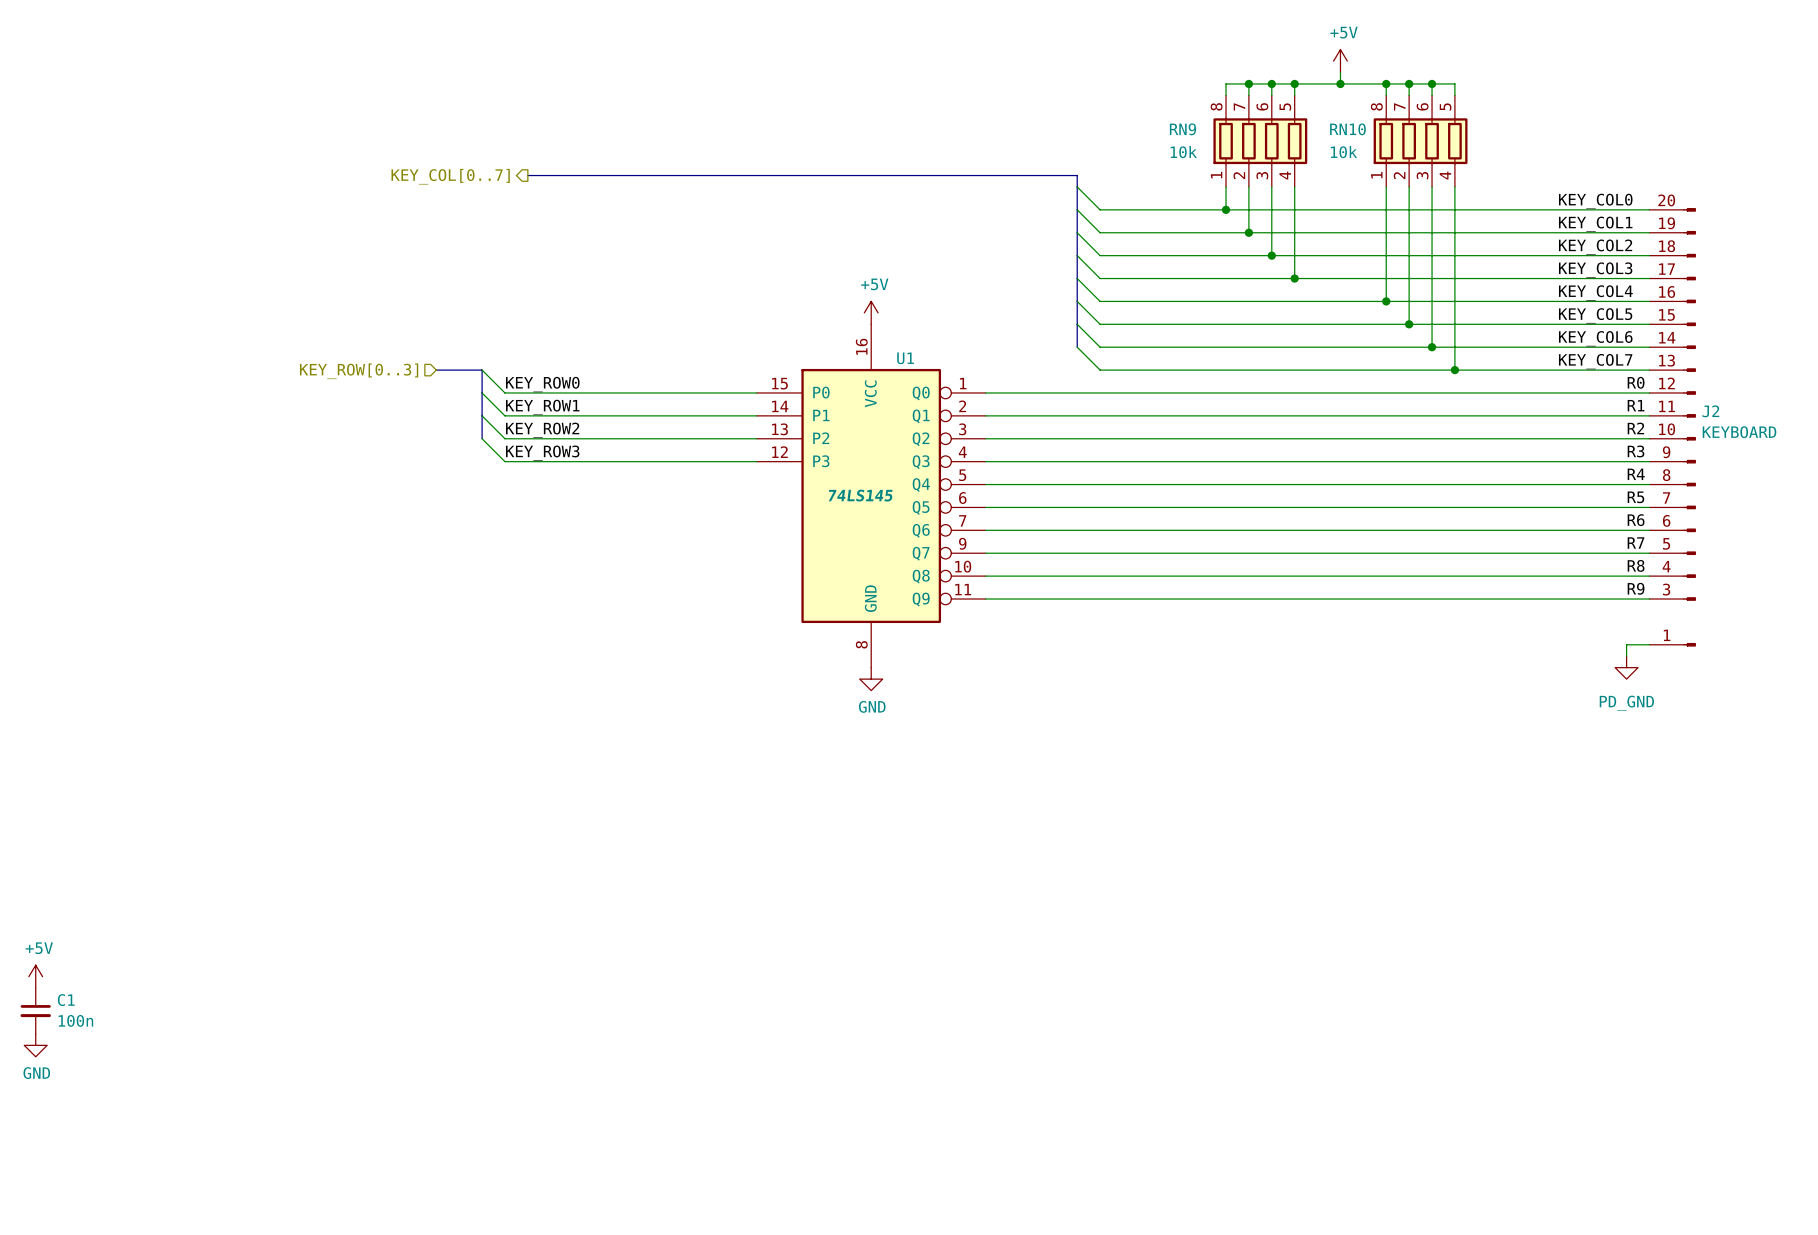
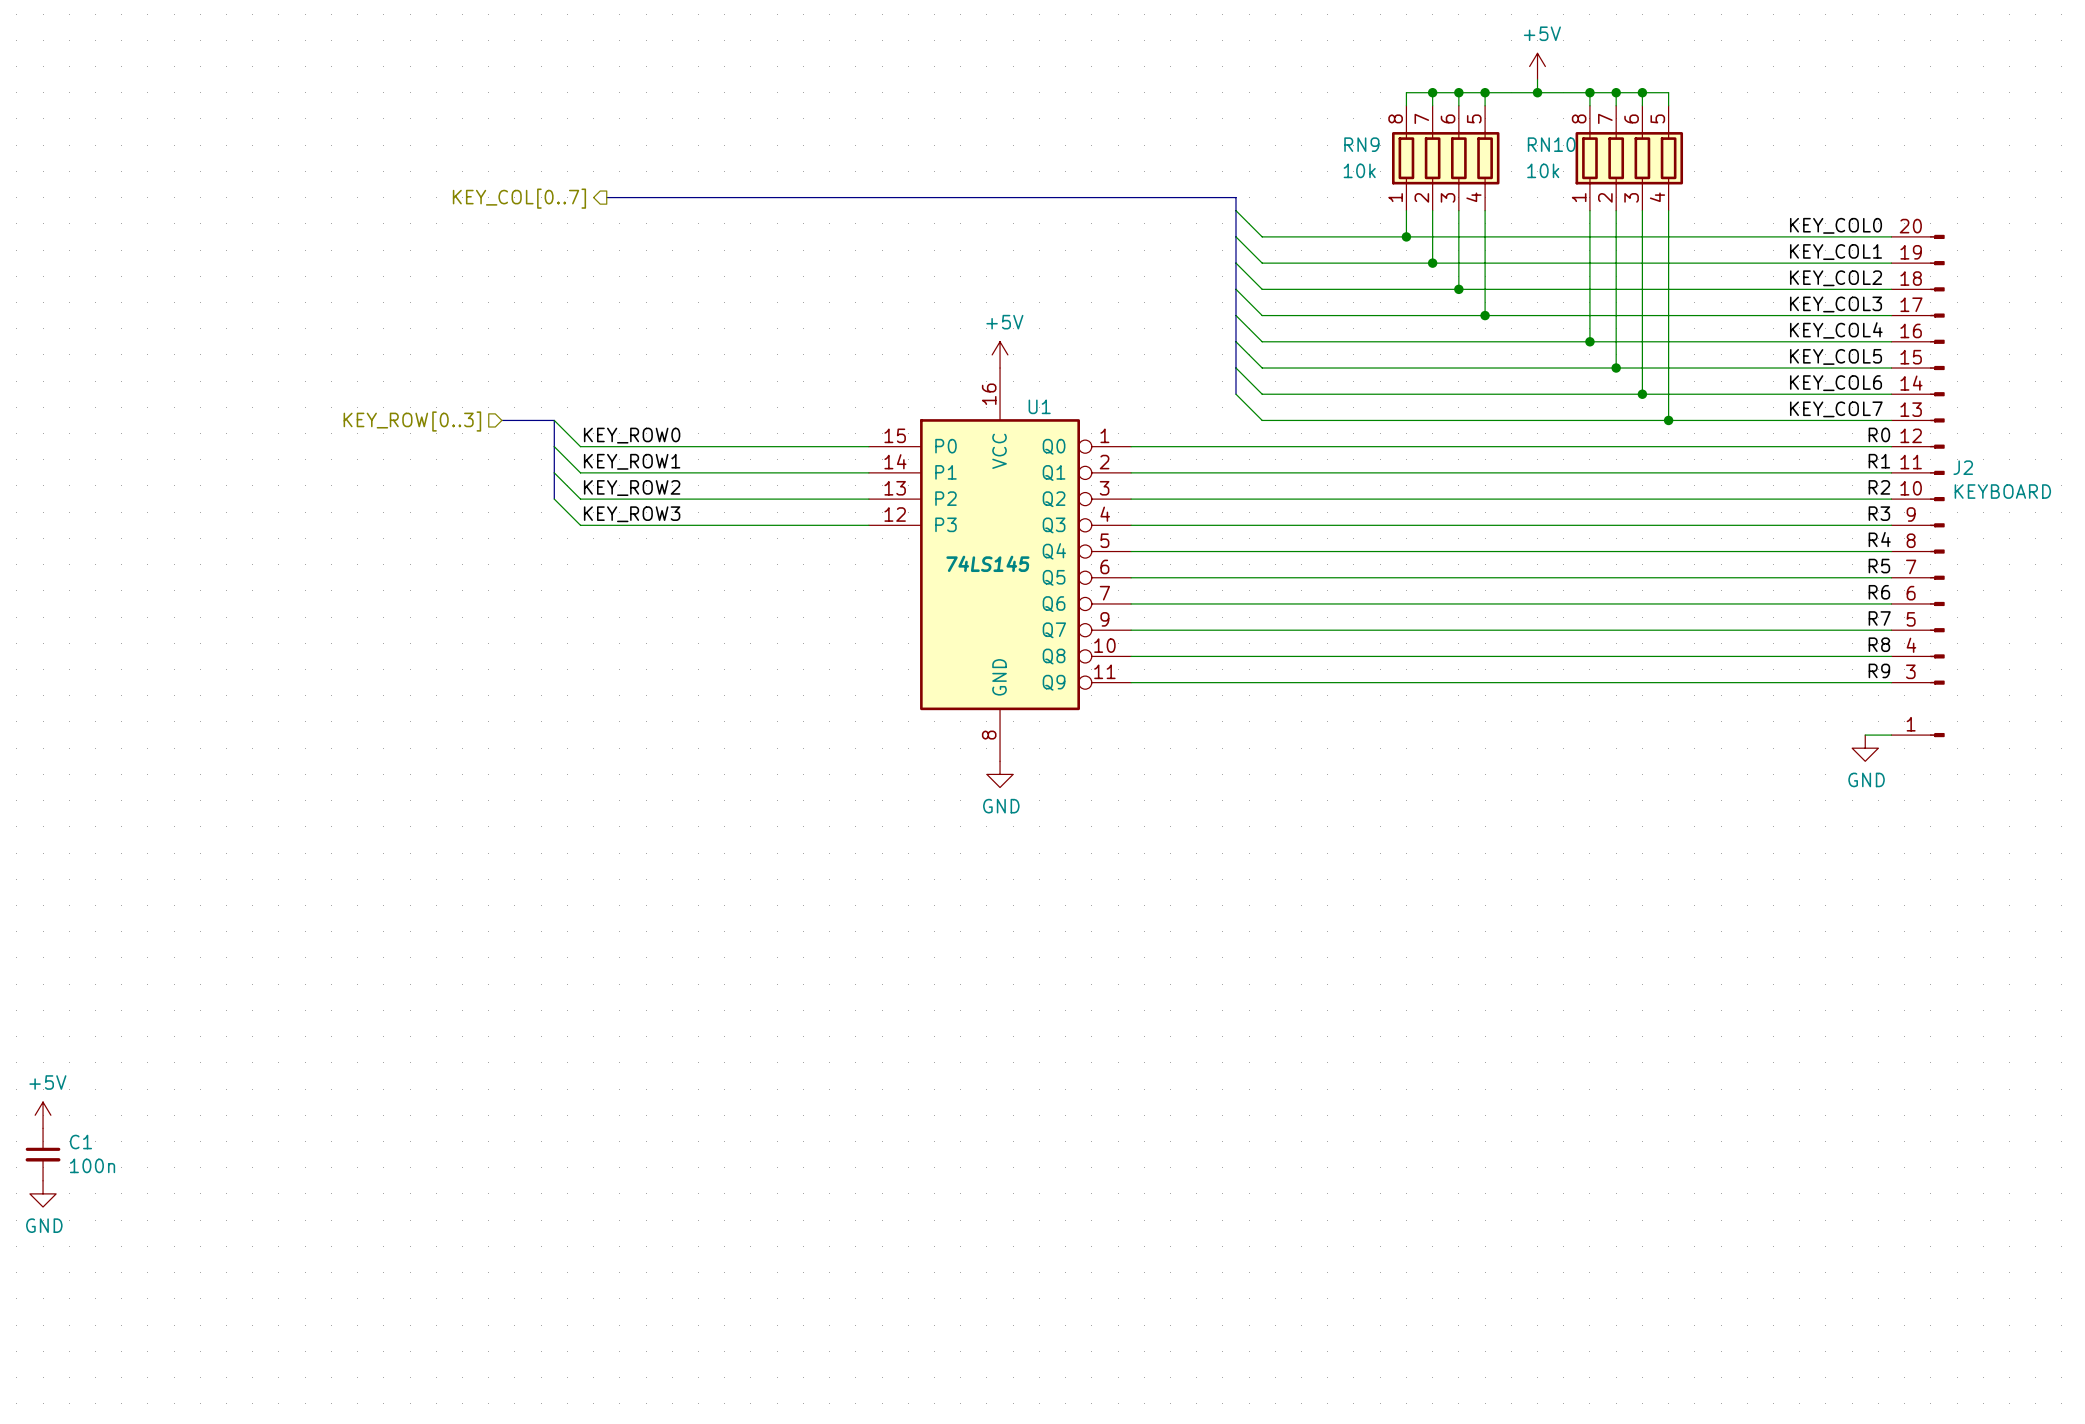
power symbol: none -> GND (1865, 748)
power symbol: PD_GND (1626, 667) -> none

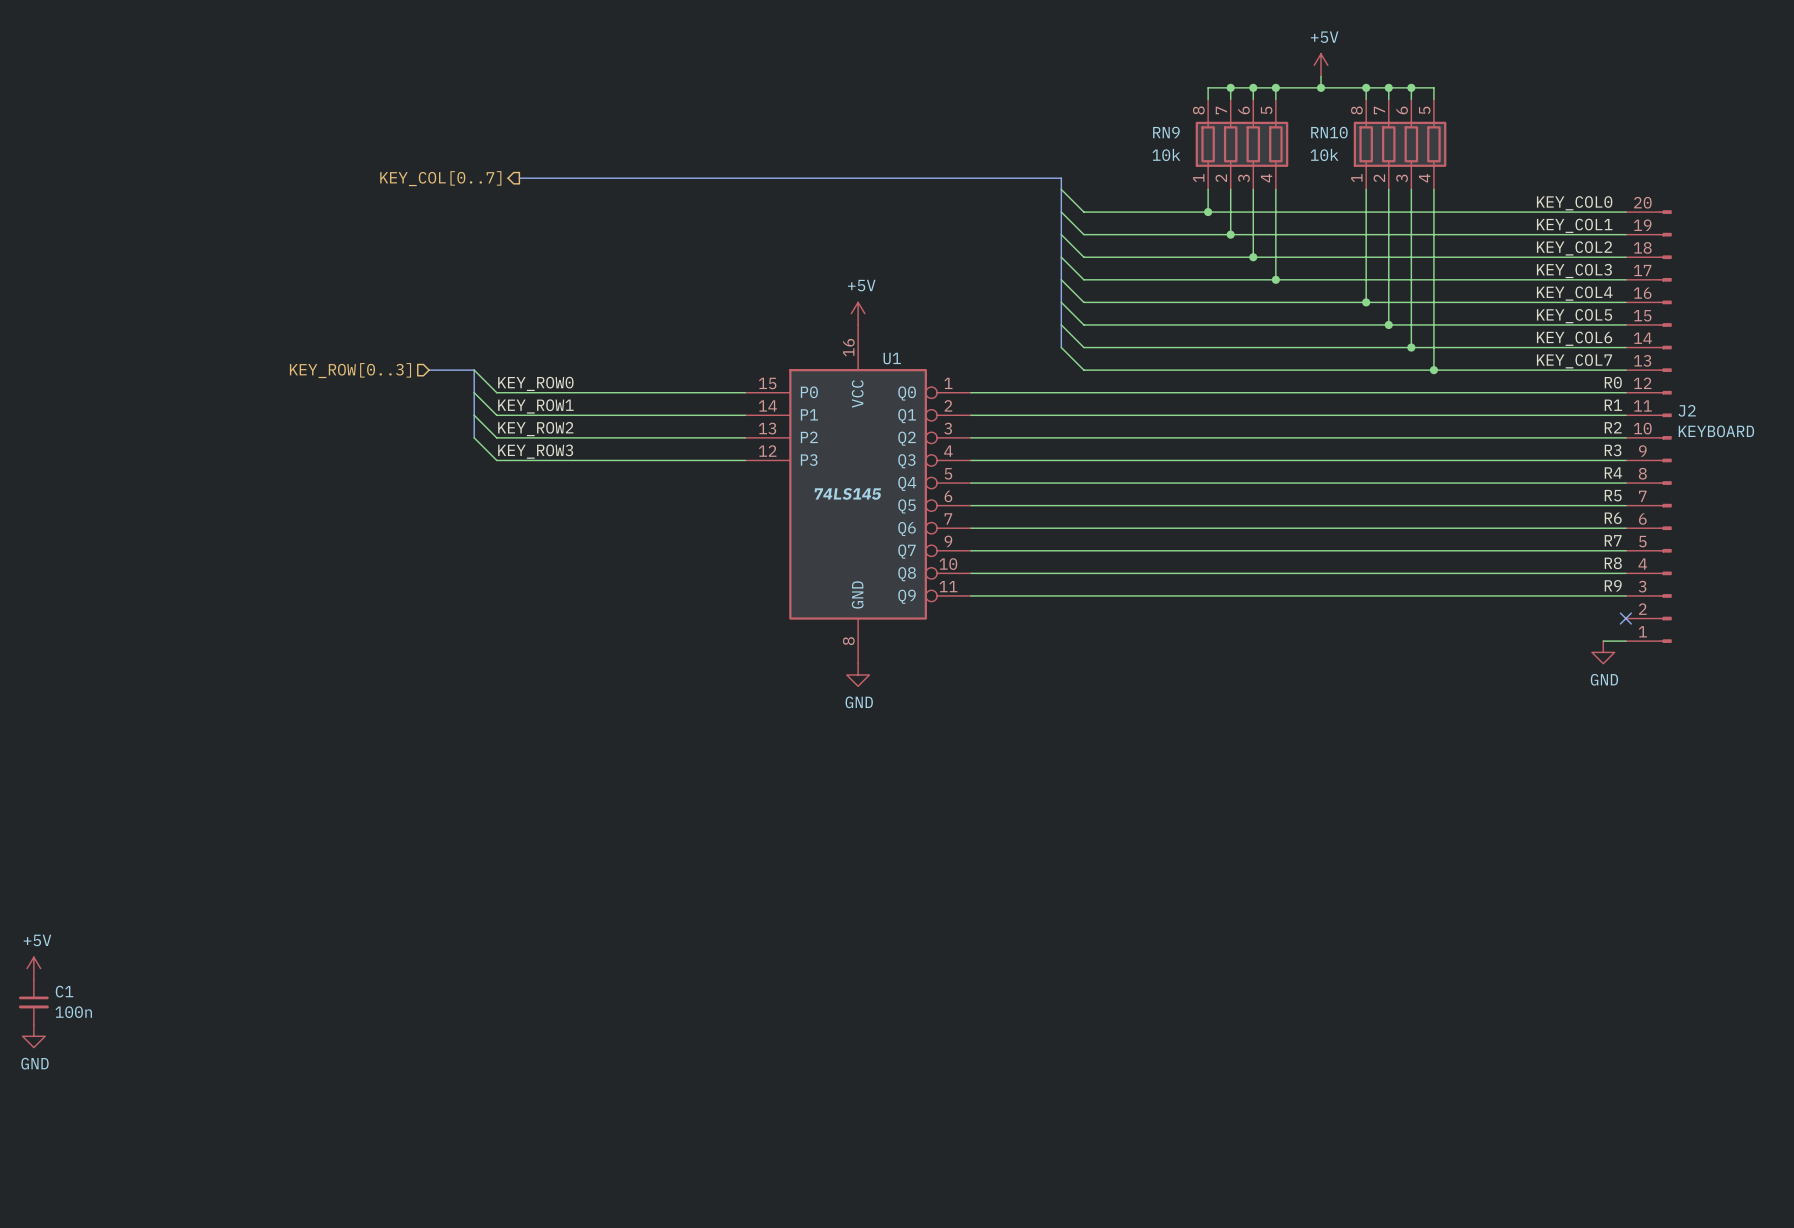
J2 symbol: [1891, 234, 1945, 738] -> [1625, 210, 1672, 643]
no-connect mark: none -> (1625, 618)

